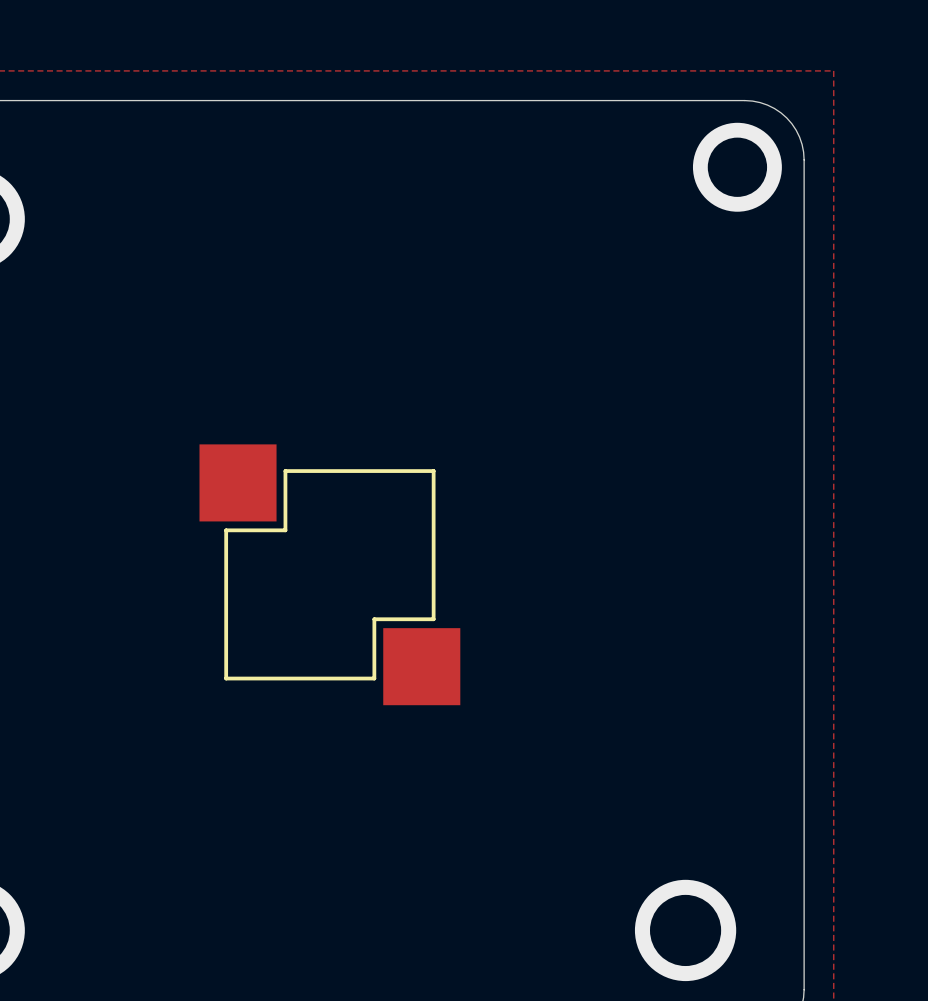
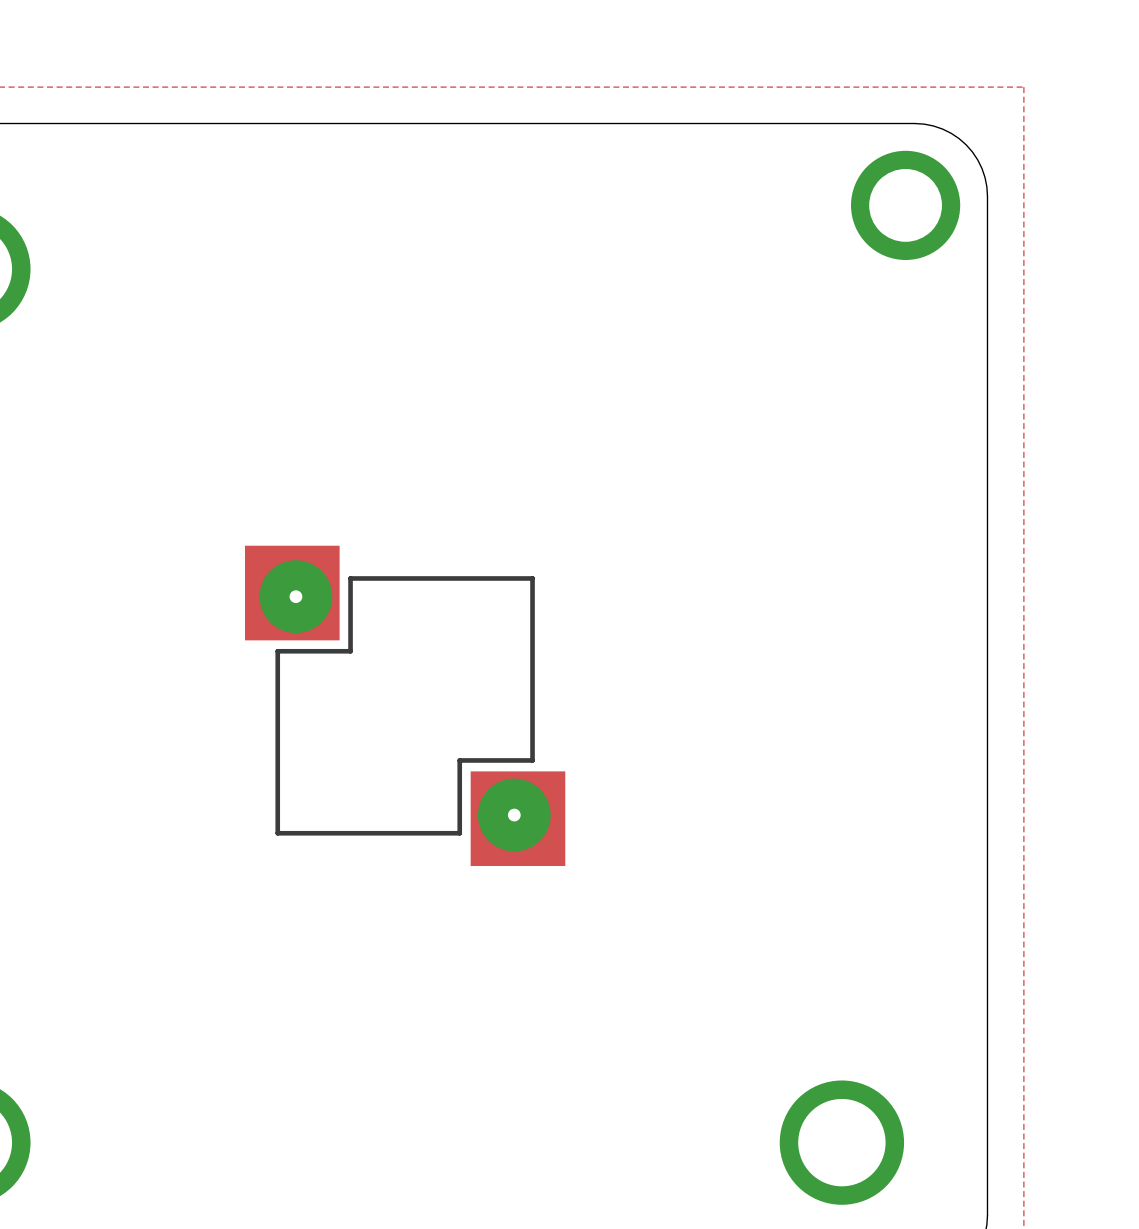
via: none -> (295, 596)
via: none -> (514, 815)

